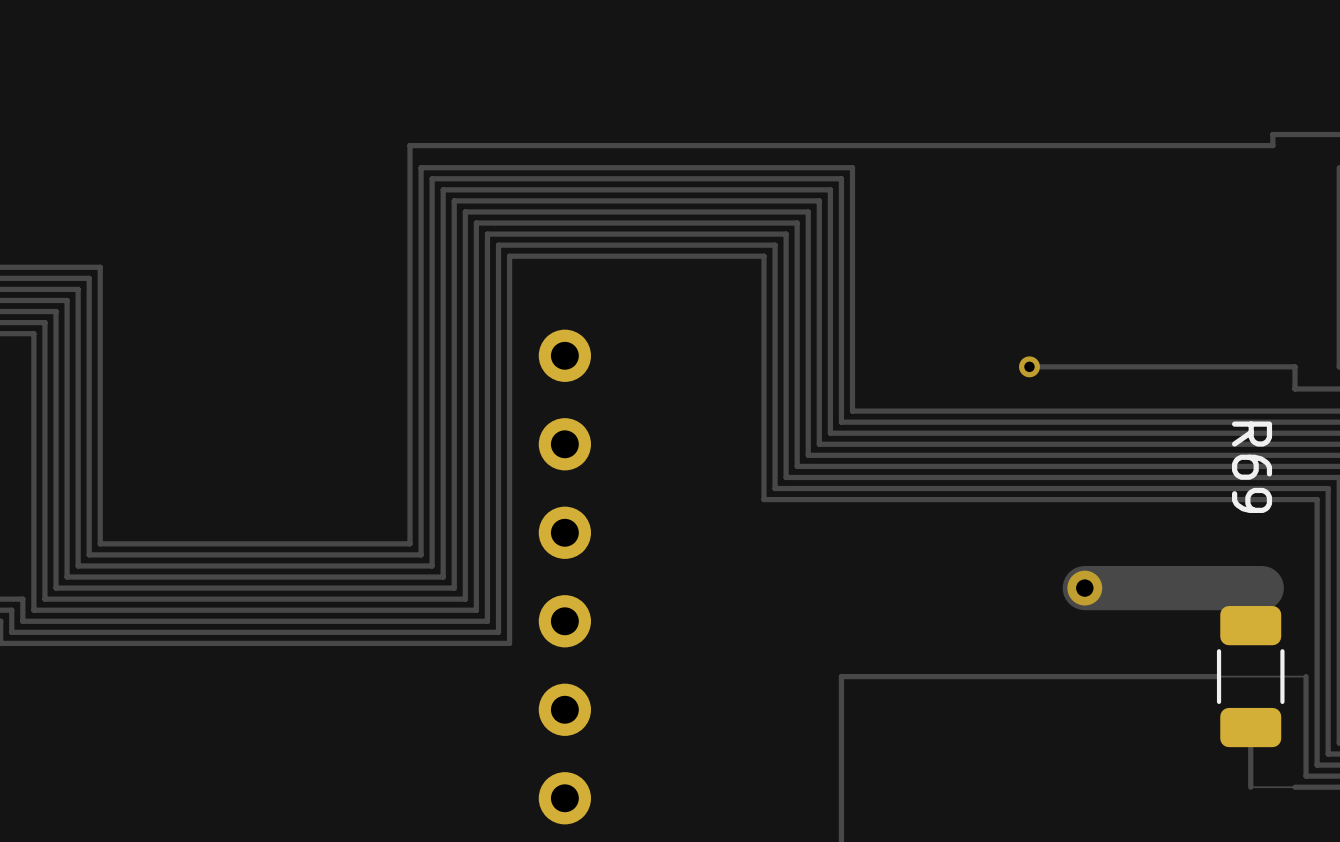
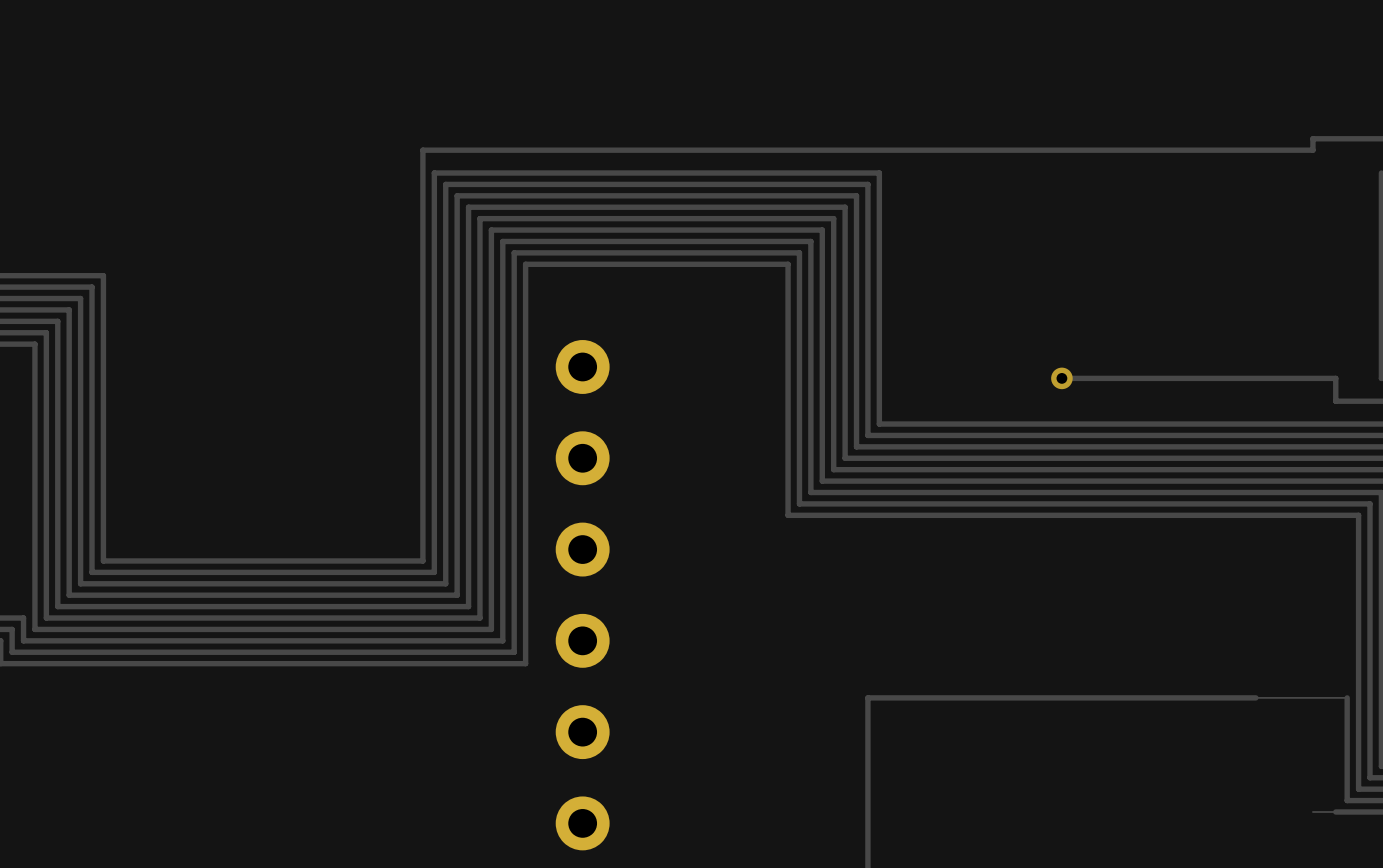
via: (1084, 588) -> none
track: (1261, 588) (1084, 588) -> none
R69: (1250, 676) -> none
track: (1250, 727) (1250, 787) (1272, 787) -> none

